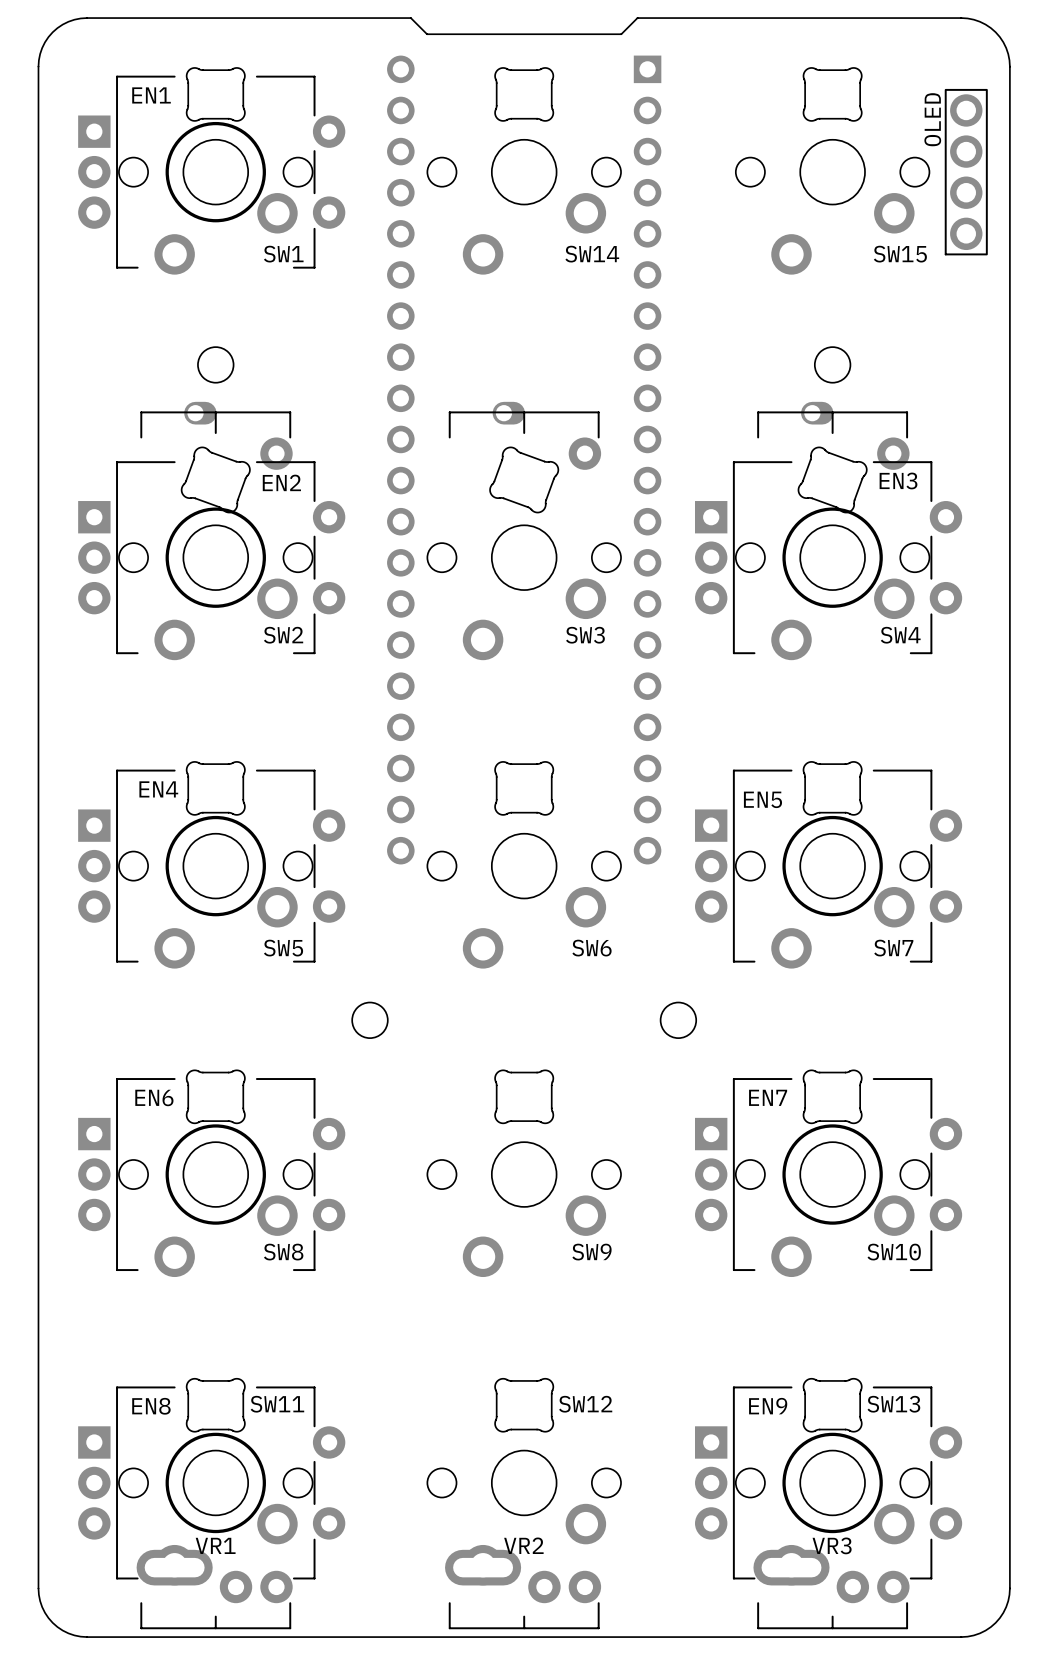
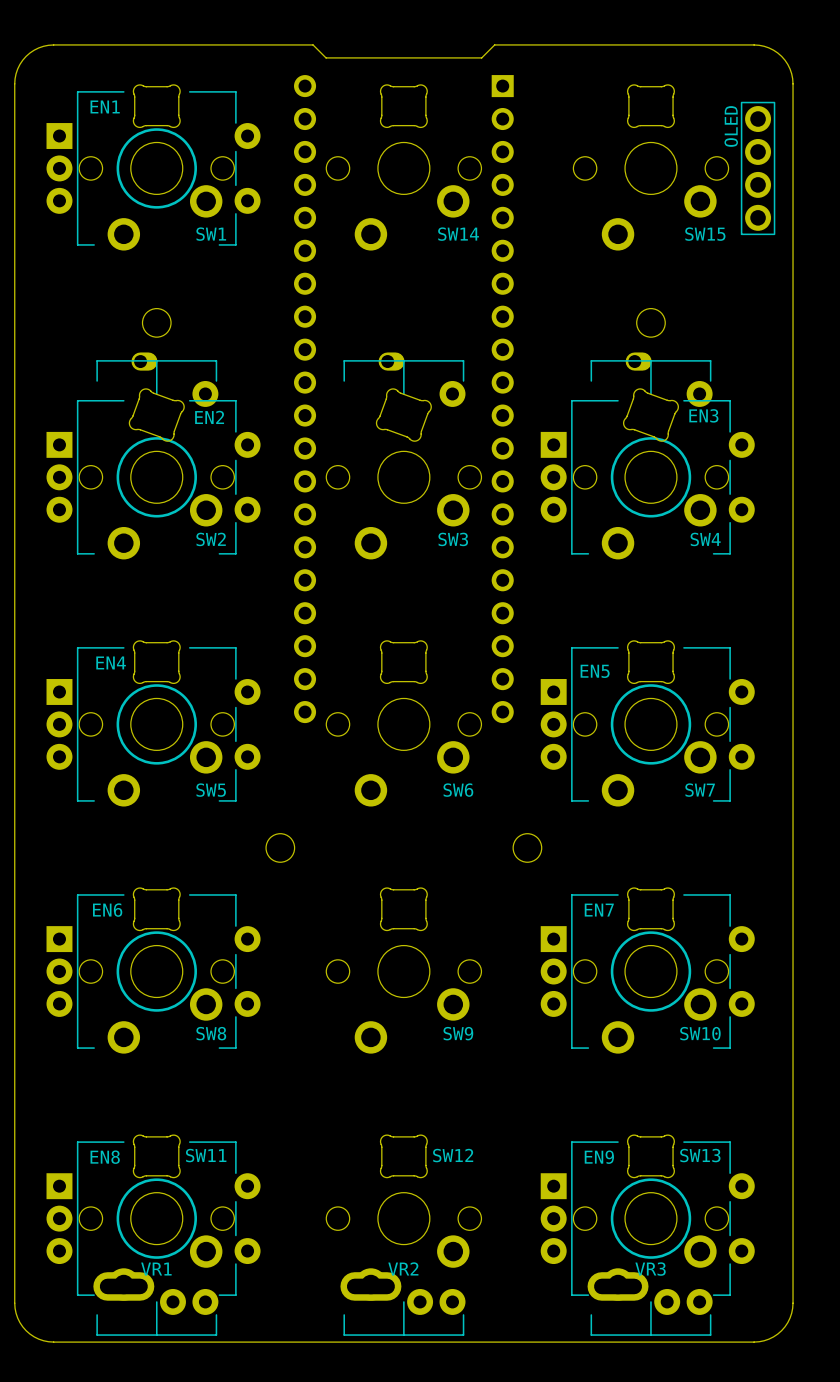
VR1 footprint: [140, 401, 293, 1630] -> [96, 352, 219, 1336]
VR2 footprint: [448, 401, 602, 1630] -> [343, 352, 466, 1336]
VR3 footprint: [757, 401, 910, 1630] -> [590, 352, 713, 1336]

